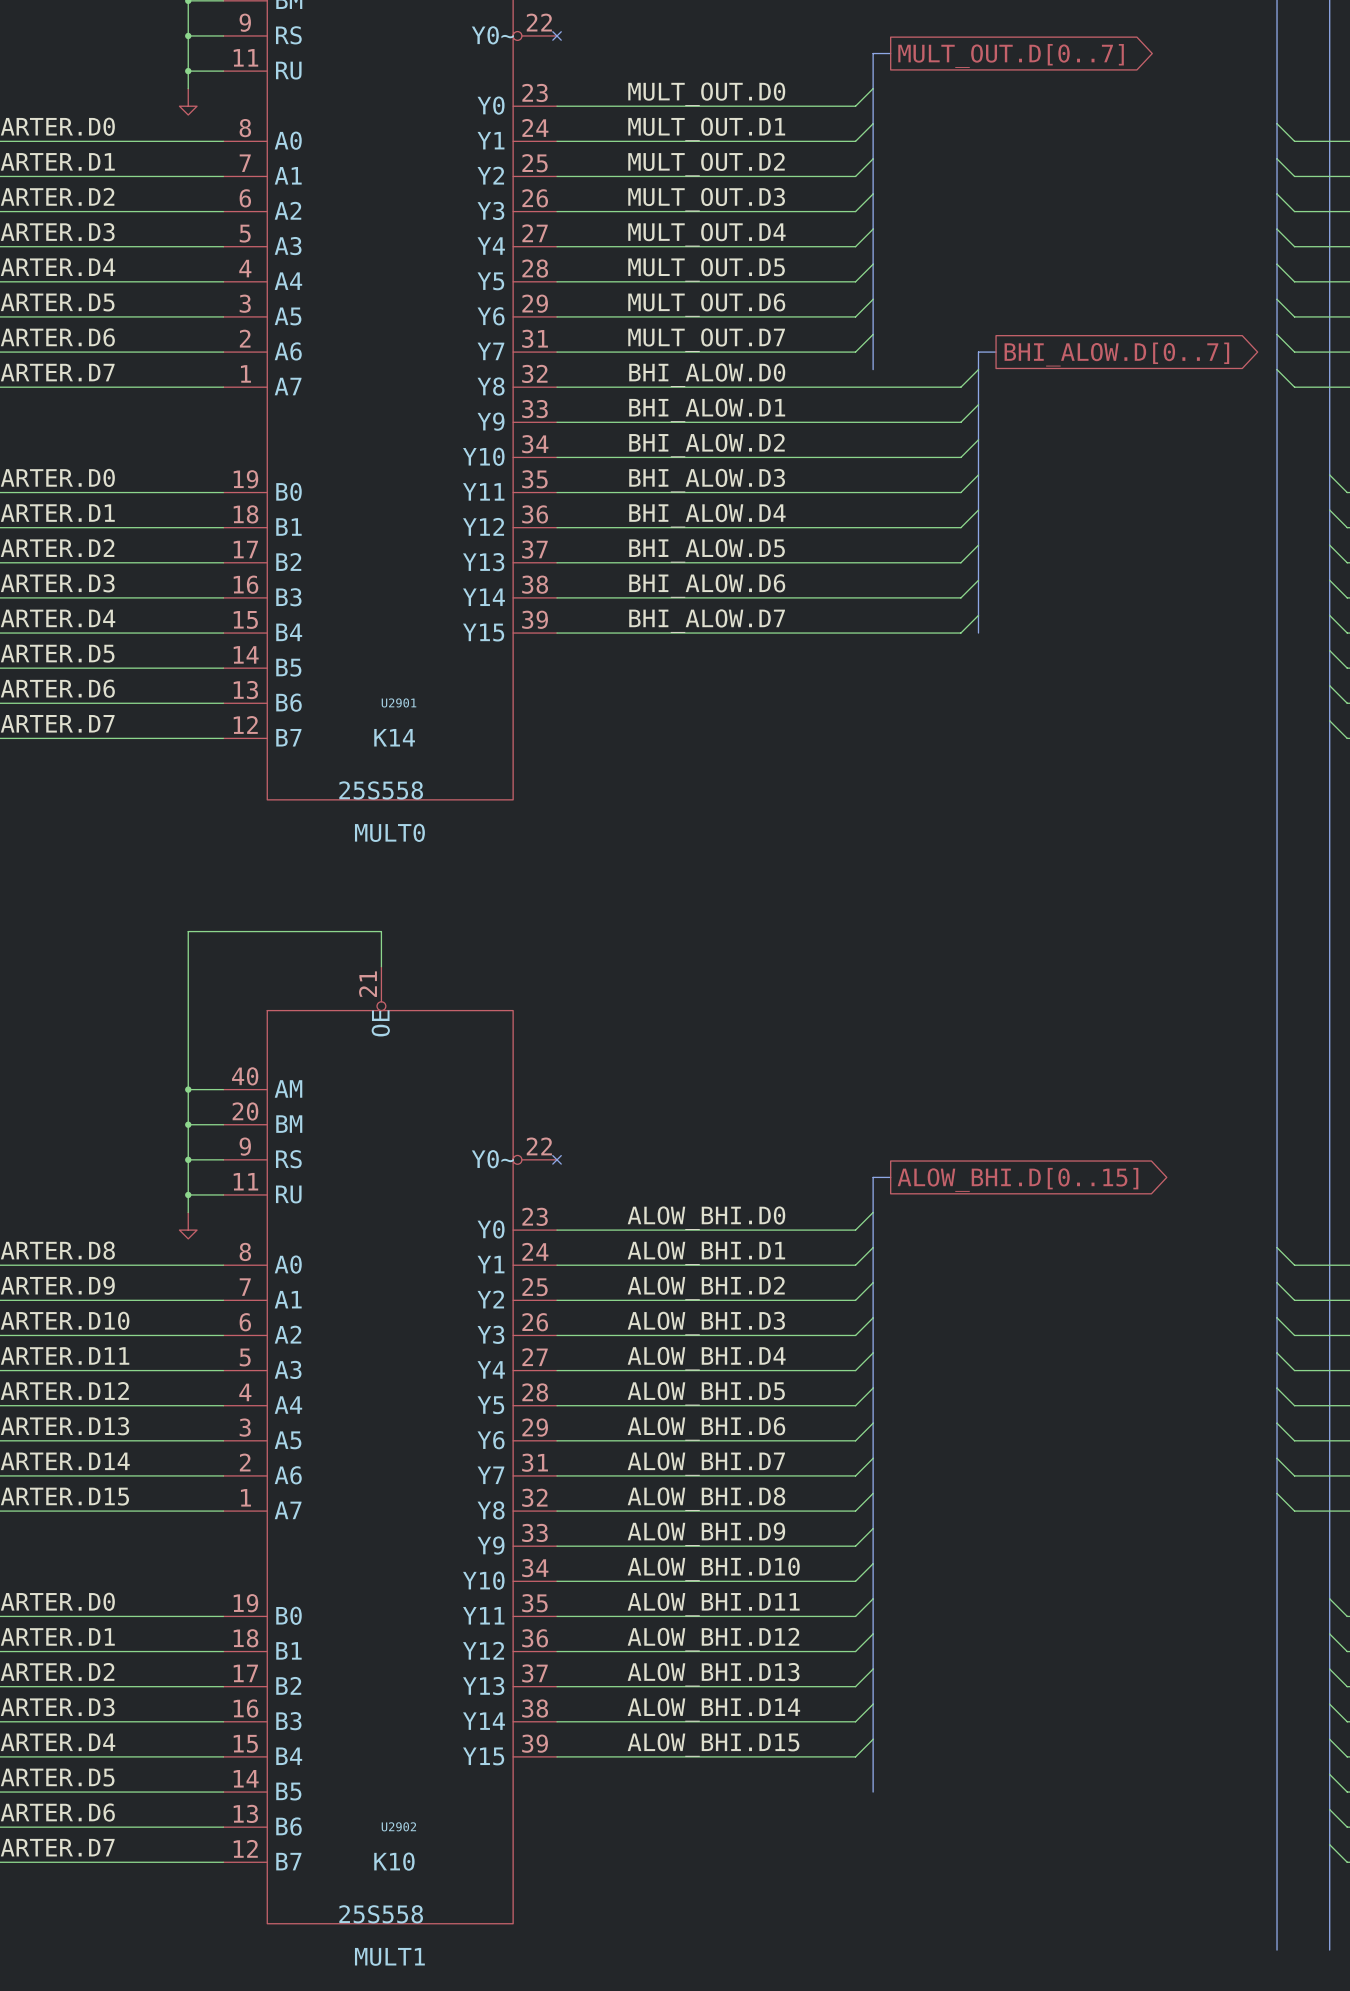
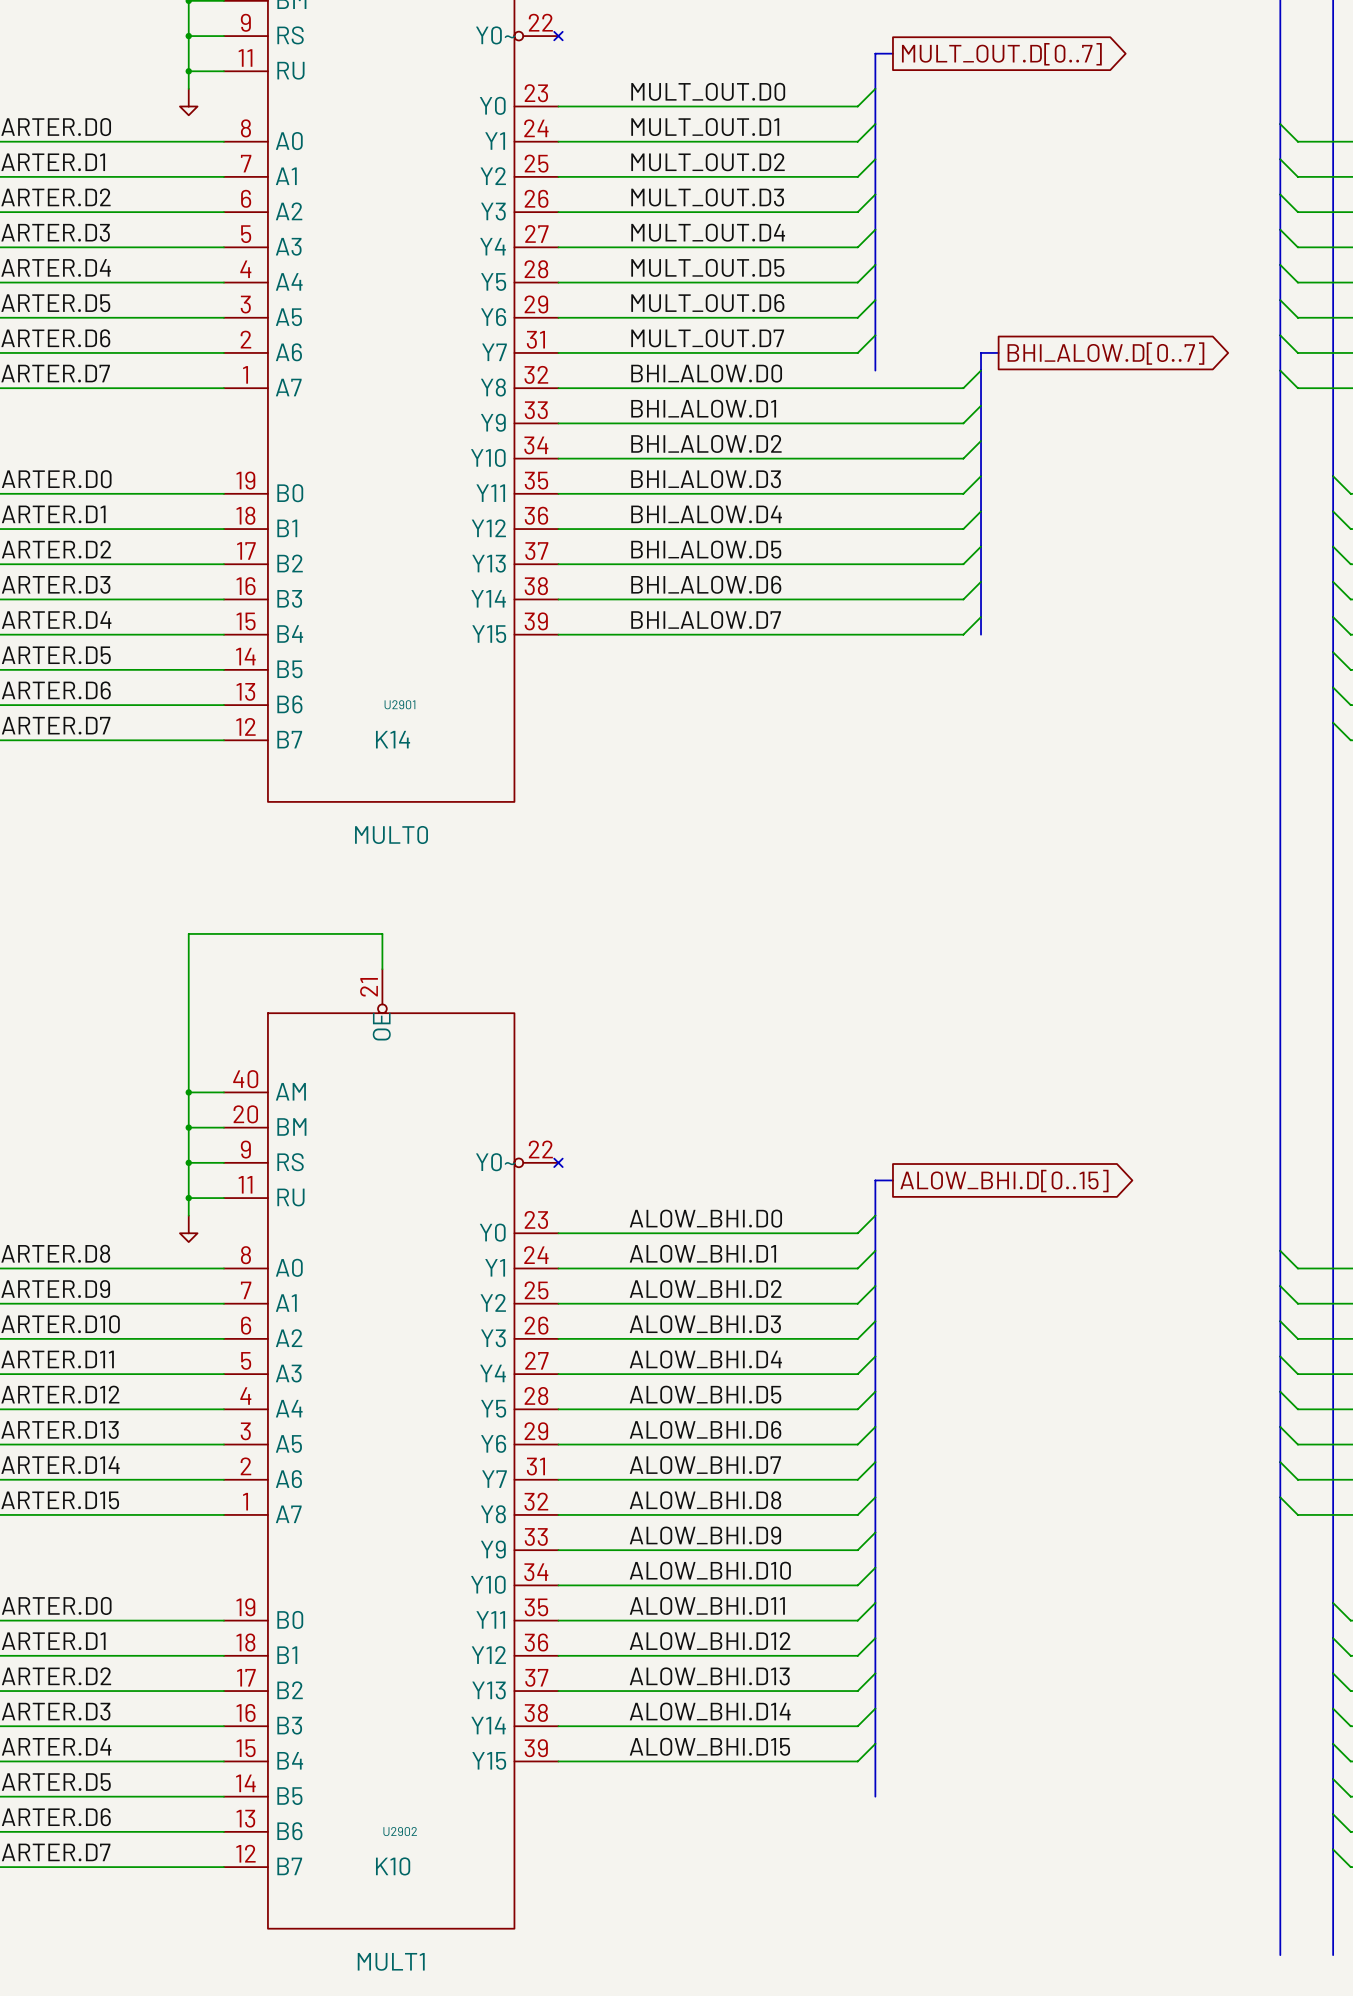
U2901 value: 25S558 (381, 790) -> none
U2902 value: 25S558 (381, 1914) -> none

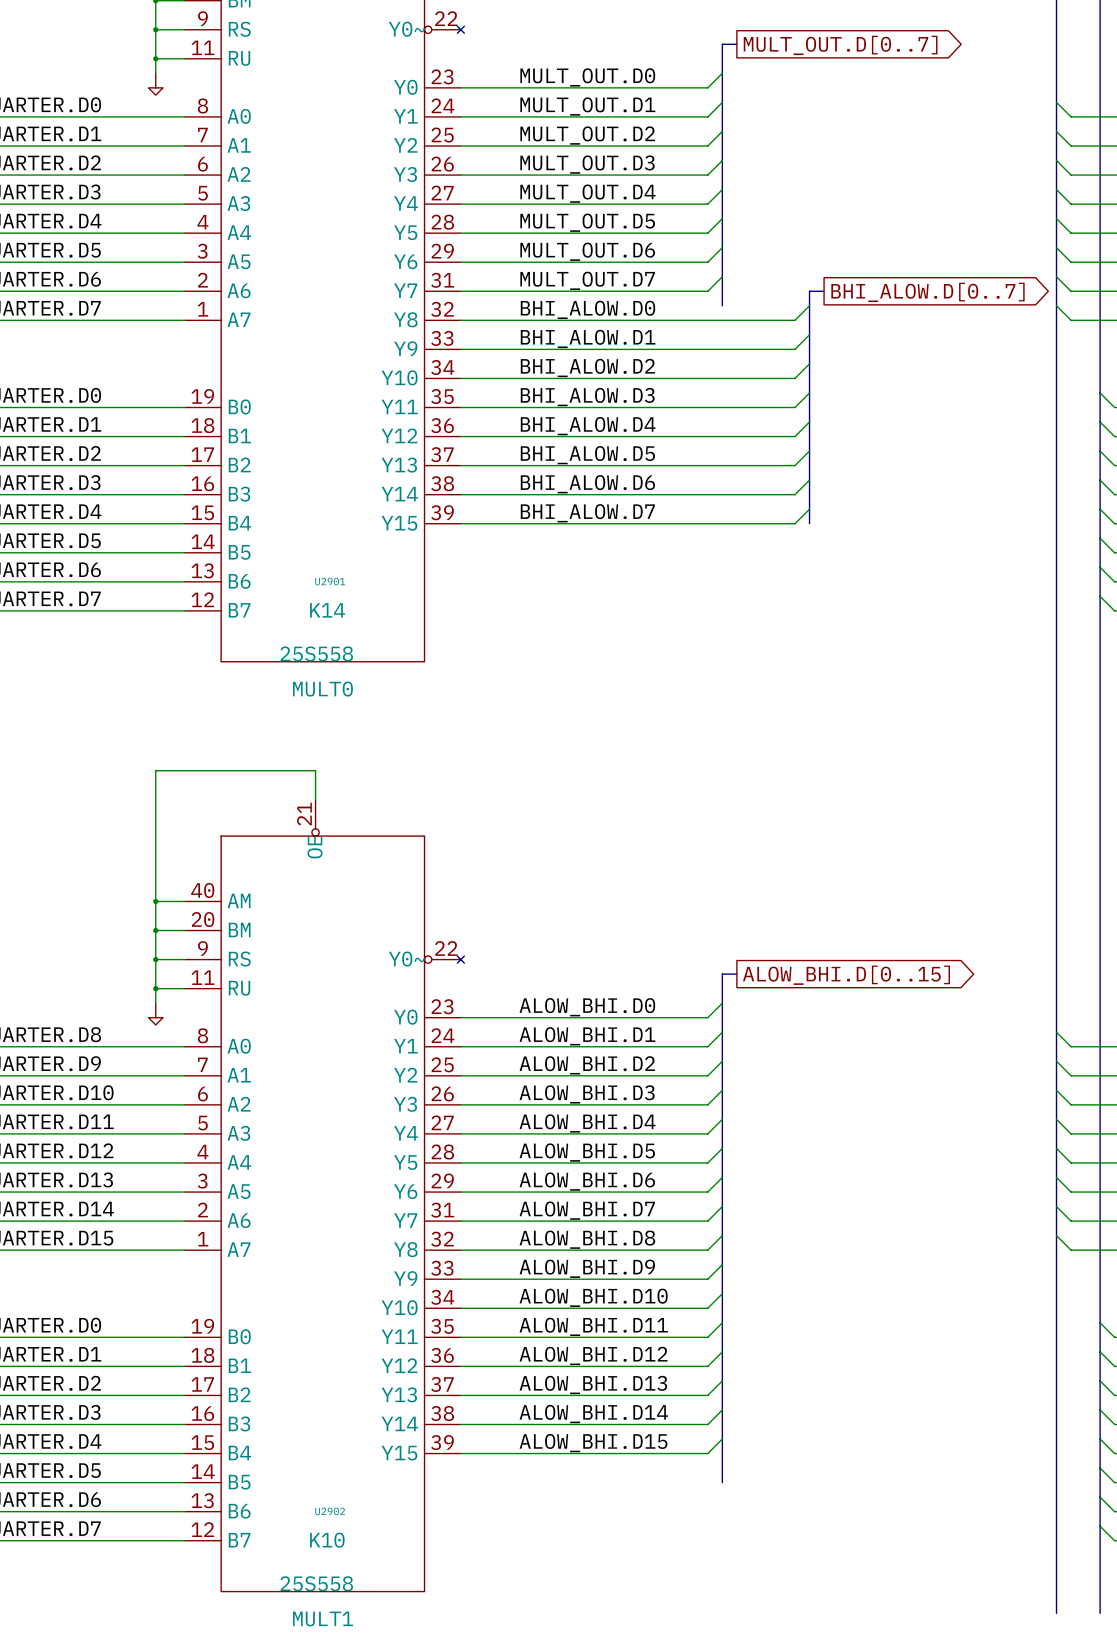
U2901 value: none -> 25S558 (316, 653)
U2902 value: none -> 25S558 (316, 1583)

